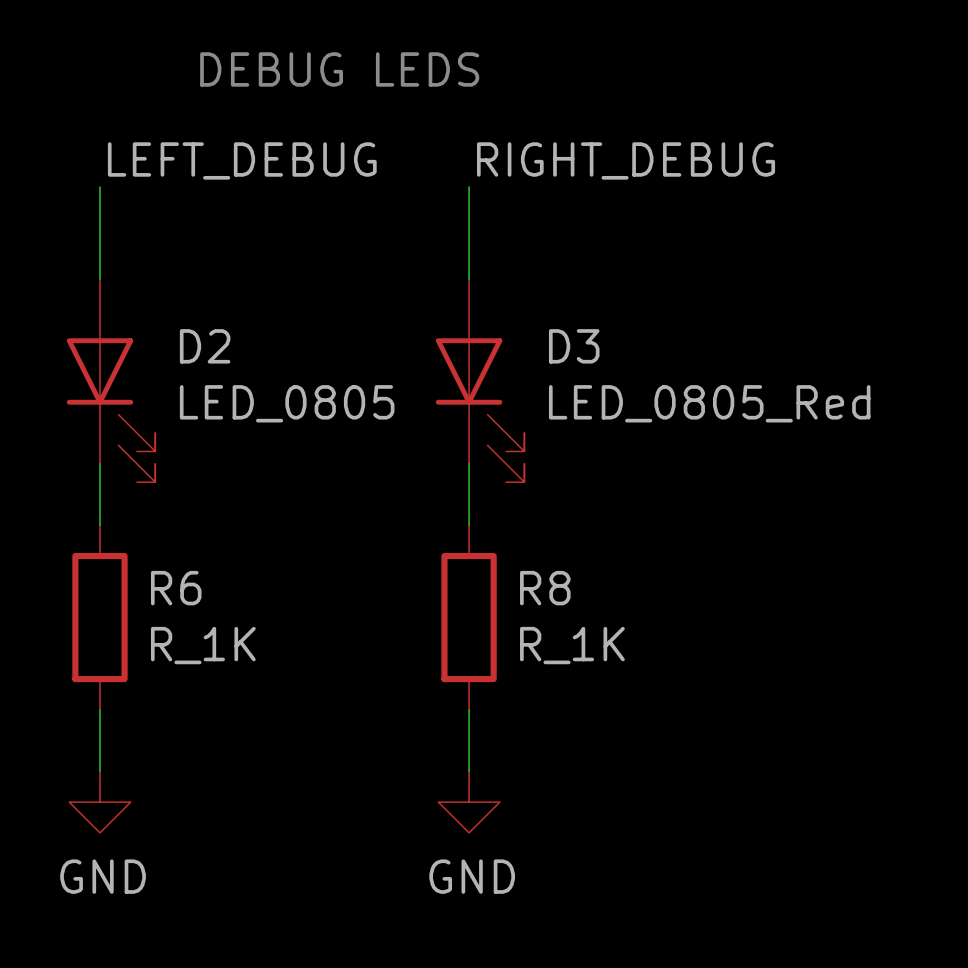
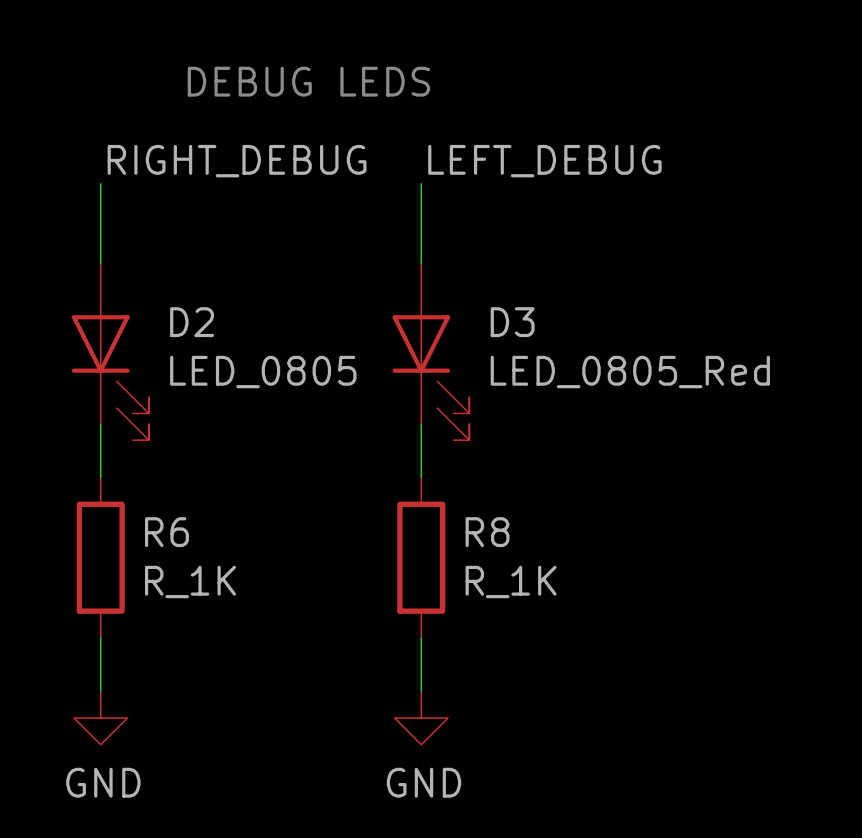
label: LEFT_DEBUG (242, 160) -> RIGHT_DEBUG (237, 161)
label: RIGHT_DEBUG (626, 160) -> LEFT_DEBUG (544, 161)

